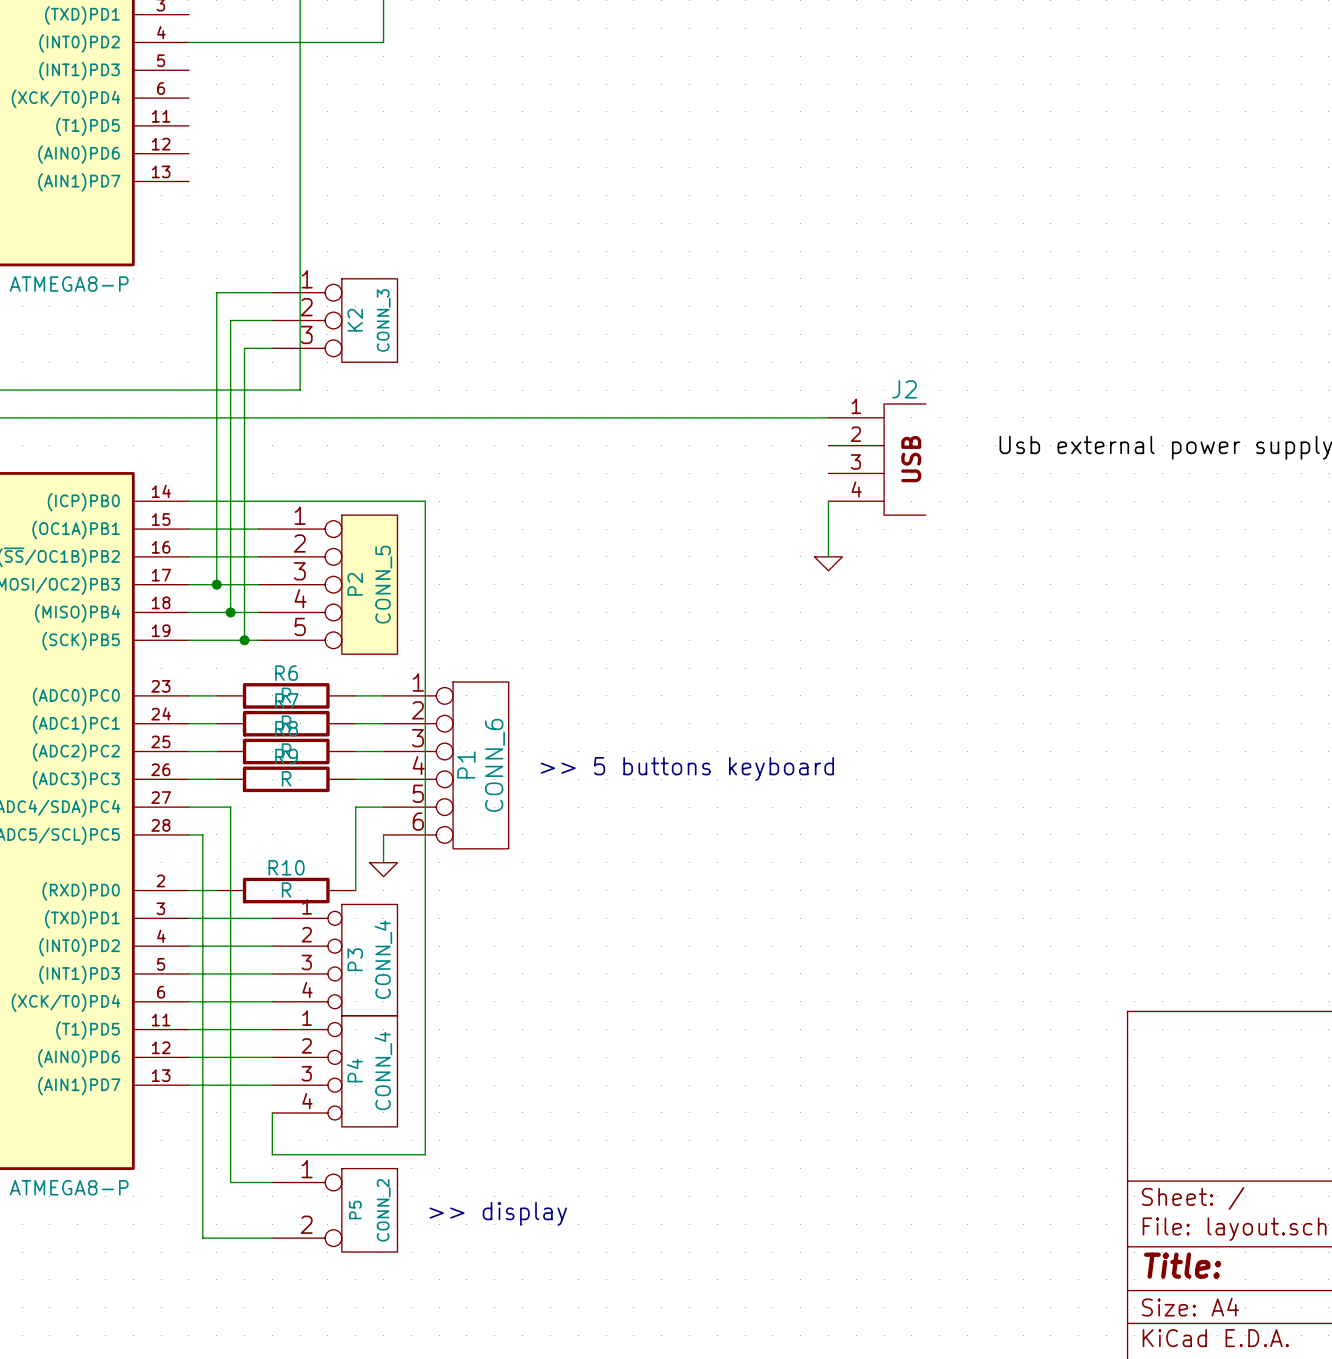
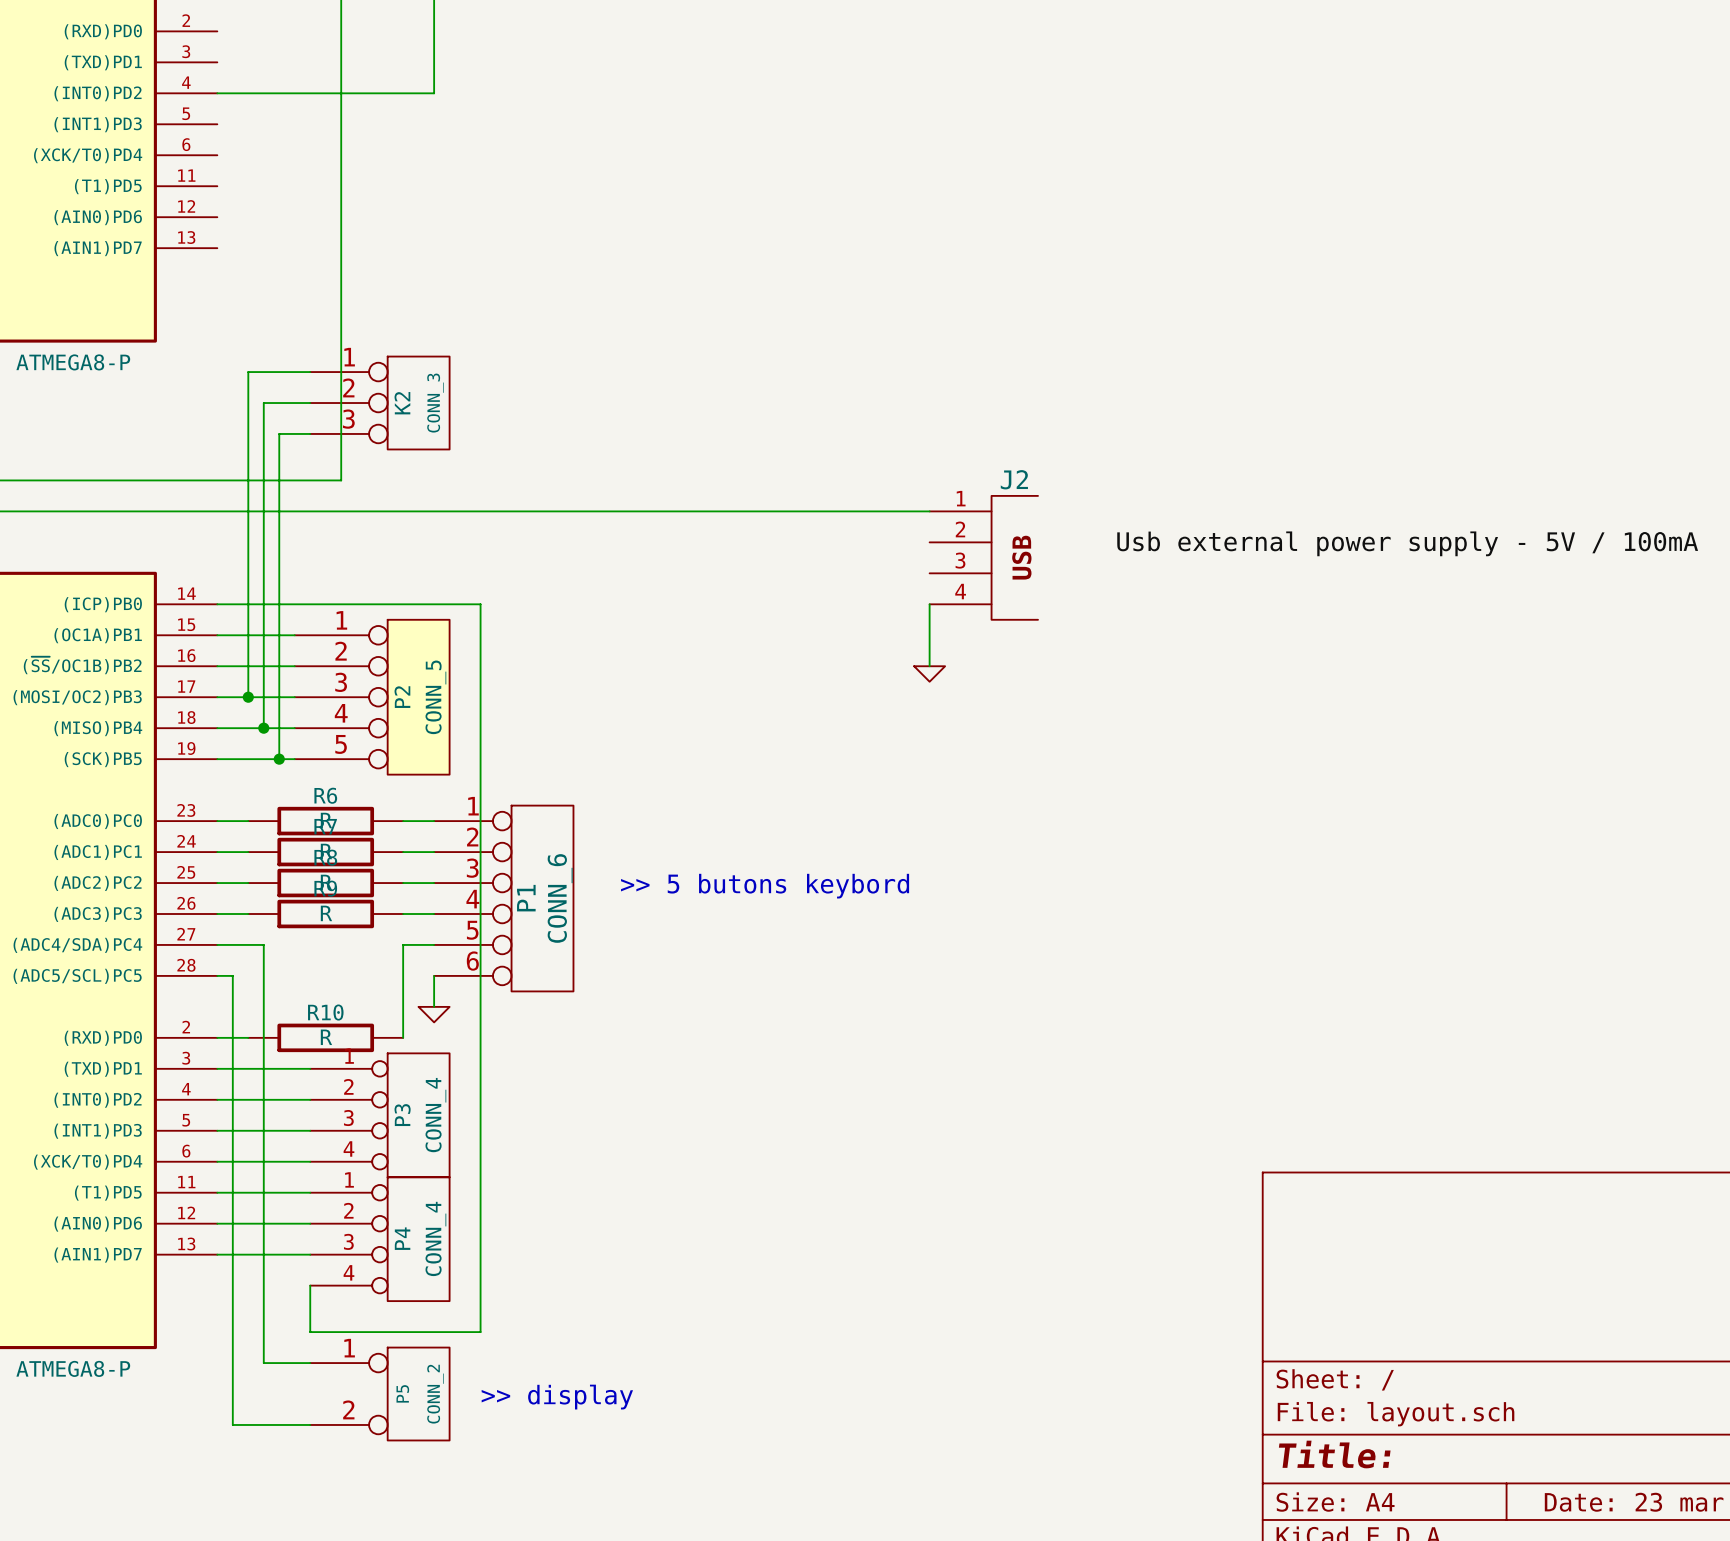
text: >> 5 buttons keyboard (687, 768) -> >> 5 butons keybord (765, 886)

